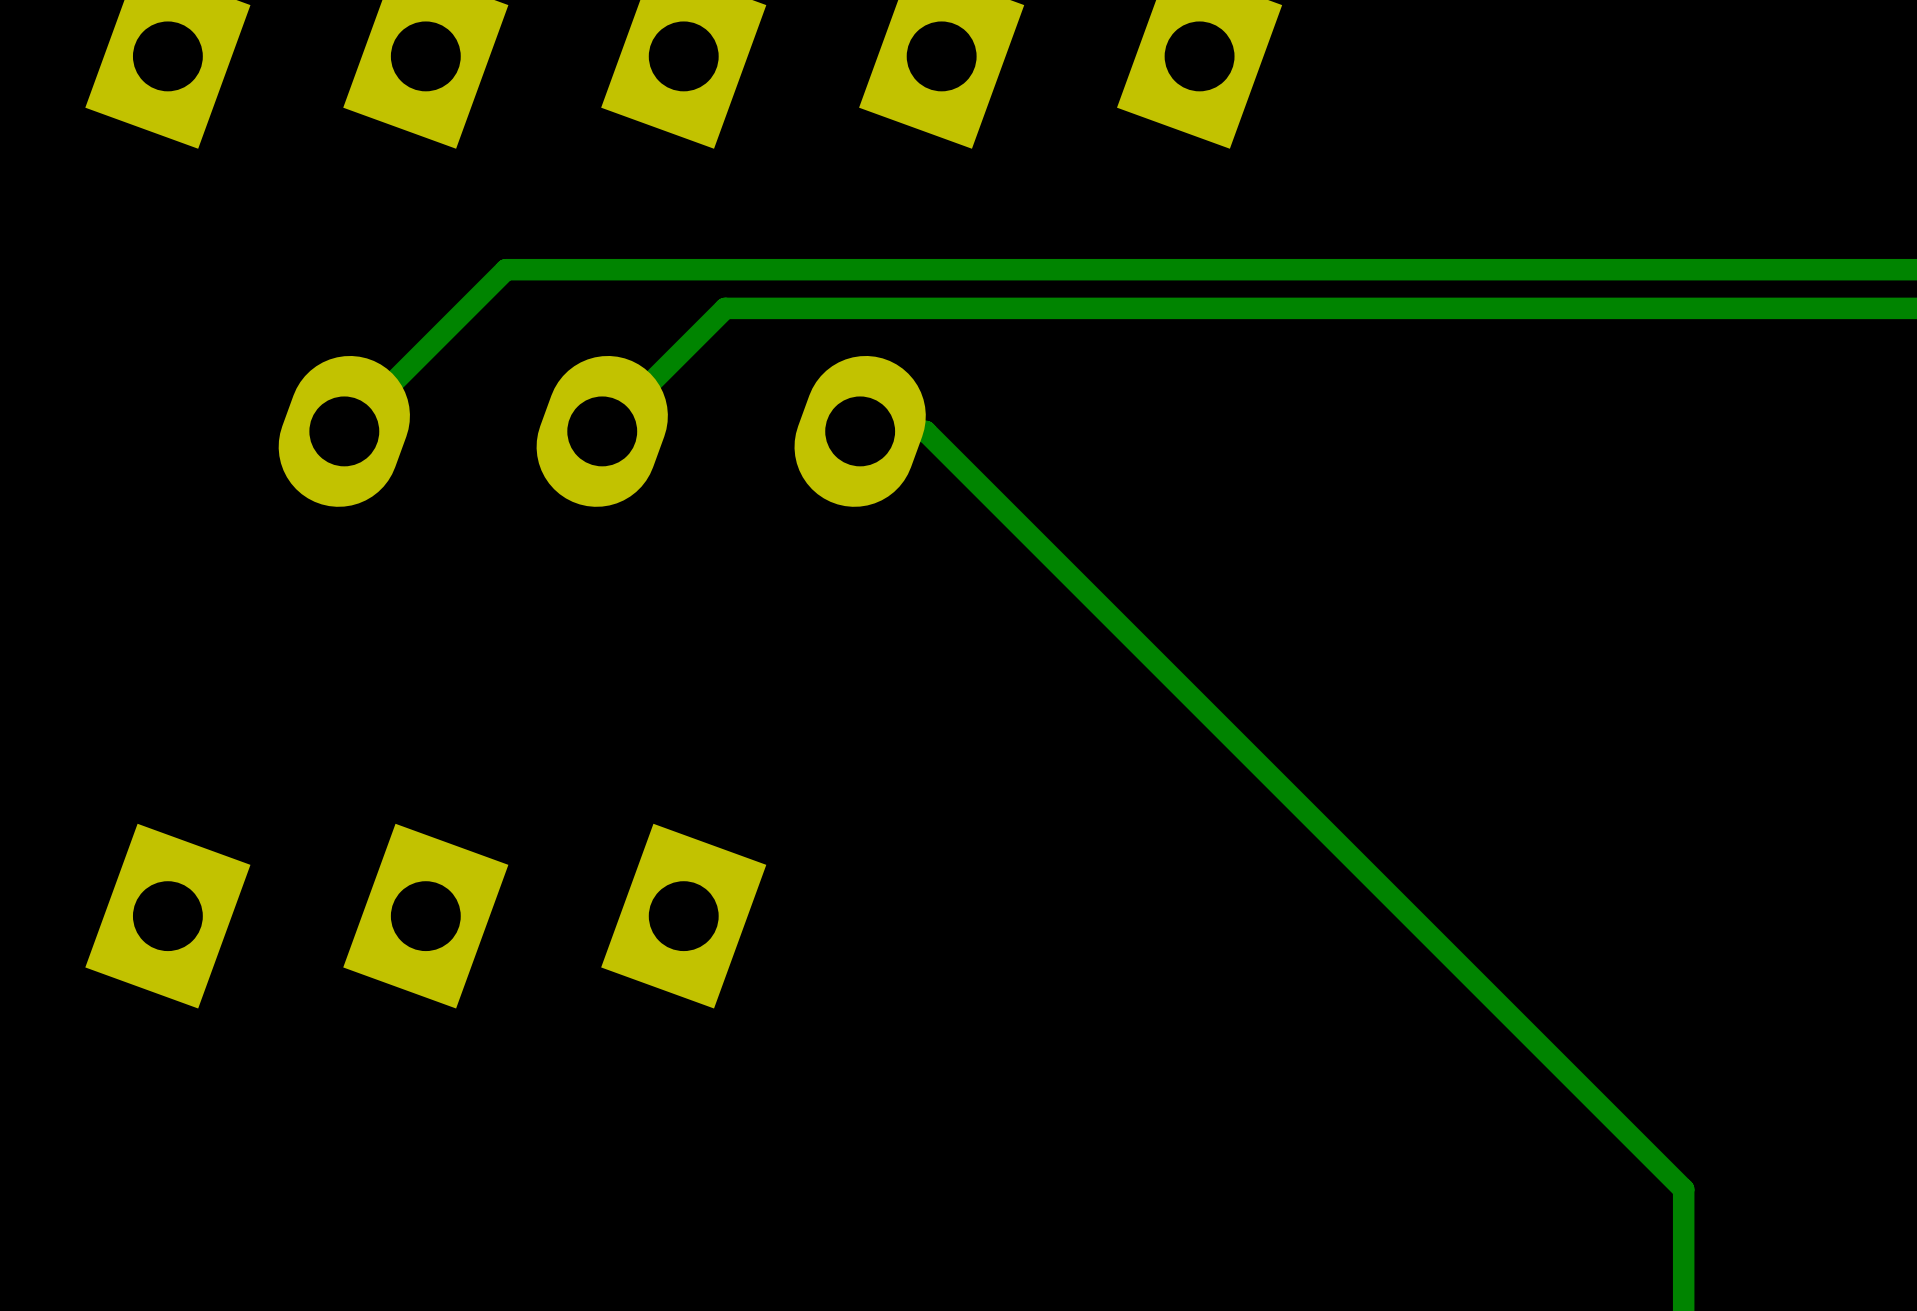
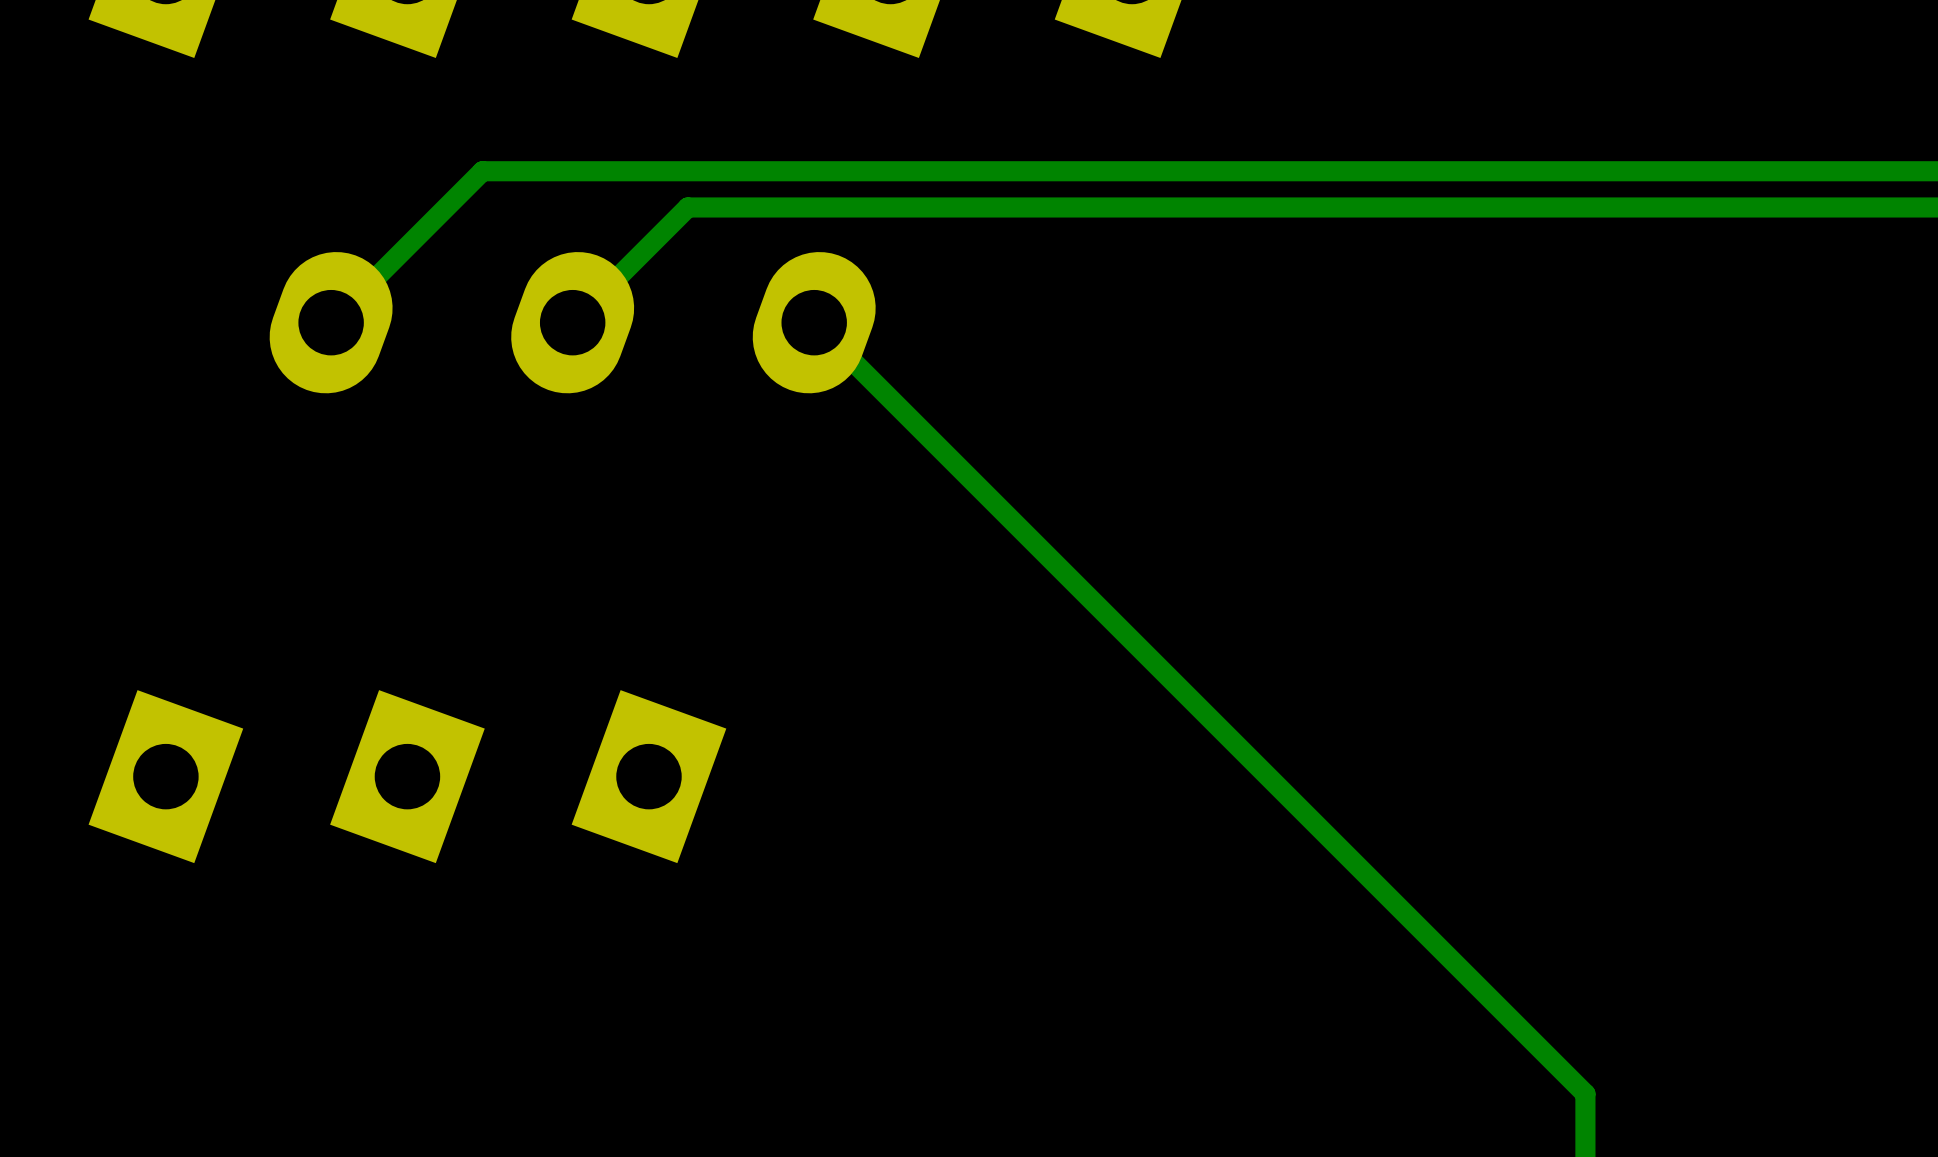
track: (903, 431) (925, 431) (1683, 1189) (1683, 1254) -> (814, 322) (1585, 1093)

